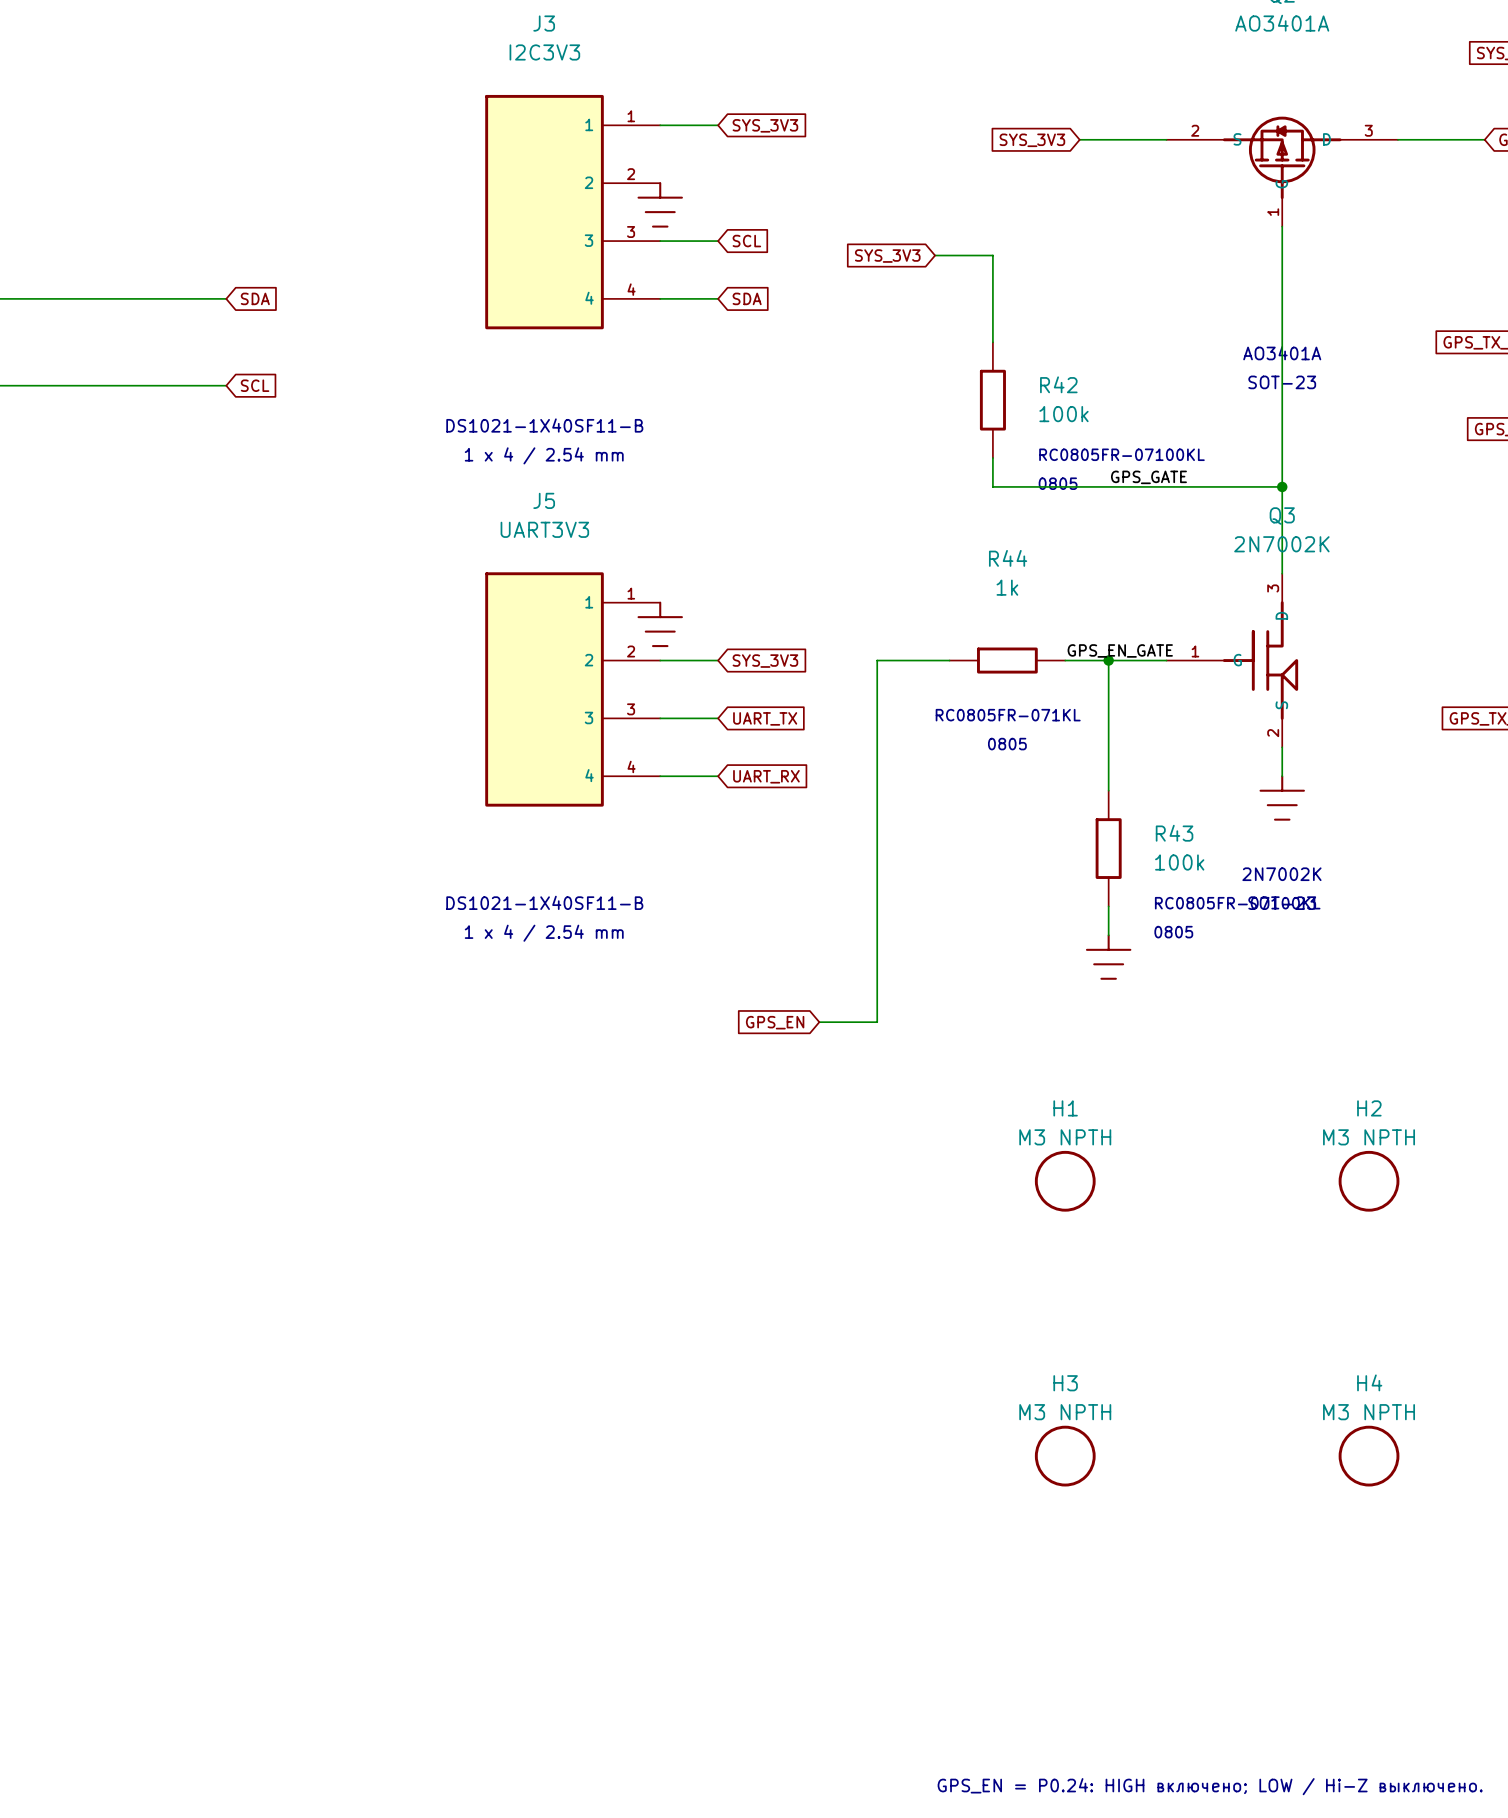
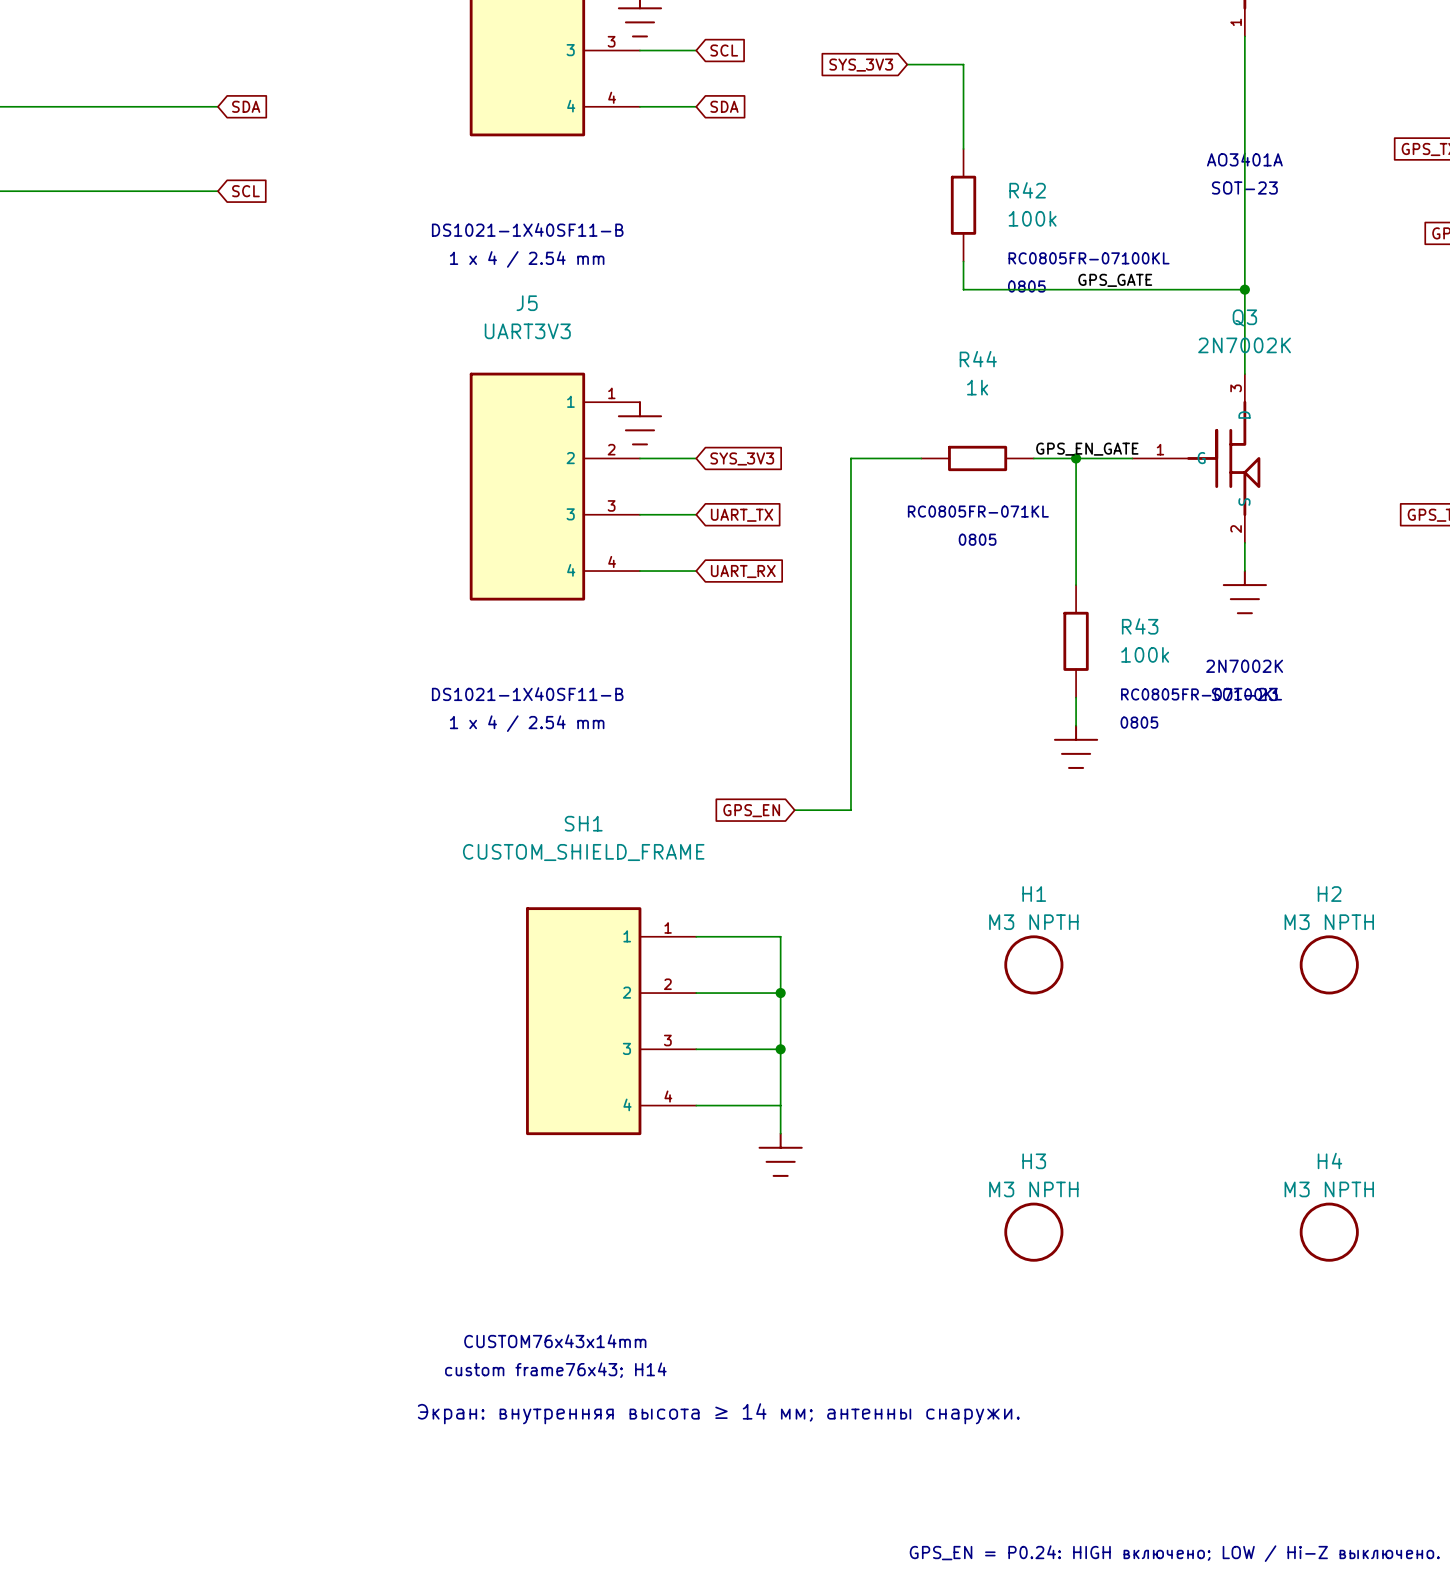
wire: none -> (696, 936) (780, 936) (780, 1133)
wire: none -> (696, 993) (780, 993)
junction: none -> (780, 993)
SH1: none -> CUSTOM_SHIELD_FRAME (611, 1021)
wire: none -> (696, 1049) (780, 1049)
junction: none -> (780, 1049)
wire: none -> (696, 1105) (780, 1105)
power symbol: none -> (780, 1154)
text: none -> CUSTOM76x43x14mm (555, 1341)
text: none -> custom frame76x43; H14 (555, 1370)
text: none -> Экран: внутренняя высота ≥ 14 мм; антенны снаружи. (718, 1413)

